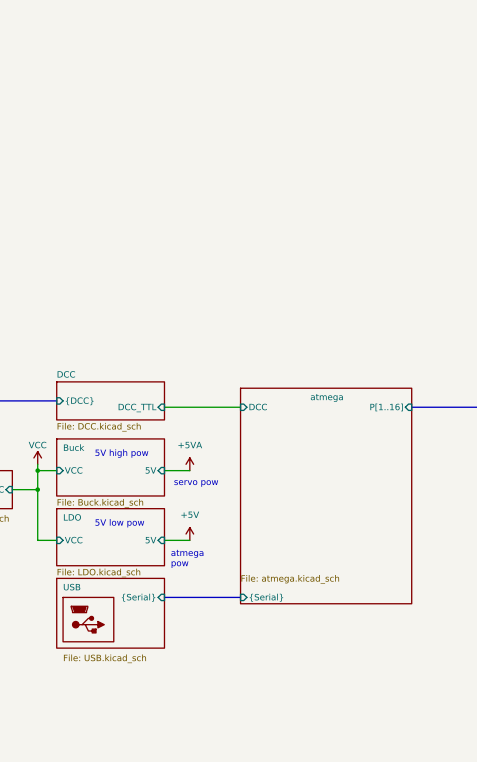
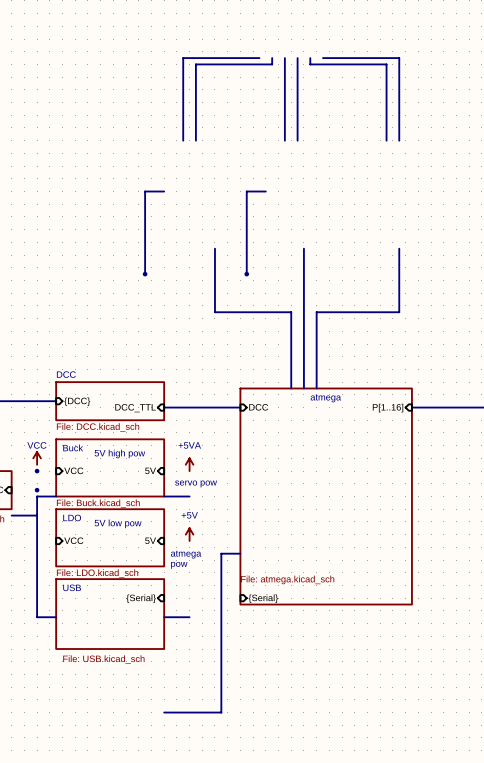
wire: none -> (259, 58) (183, 58) (183, 140)
wire: none -> (272, 58) (272, 64) (195, 64) (195, 140)
wire: none -> (284, 58) (284, 140)
wire: none -> (297, 58) (297, 140)
wire: none -> (310, 58) (310, 64) (386, 64) (386, 140)
wire: none -> (323, 58) (399, 58) (399, 140)
bus: none -> (164, 191) (145, 191) (145, 274)
bus: none -> (265, 191) (246, 191) (246, 274)
bus: none -> (214, 248) (214, 312) (291, 312) (291, 388)
bus: none -> (303, 248) (303, 388)
bus: none -> (399, 248) (399, 312) (316, 312) (316, 388)
junction: none -> (145, 274)
junction: none -> (246, 274)
wire: (37, 464) (37, 495) -> (56, 496) (37, 496)
wire: (37, 470) (56, 470) -> none
wire: (164, 470) (189, 470) -> (164, 496) (189, 496)
wire: (12, 489) (37, 489) -> (11, 515) (37, 515)
wire: (37, 540) (56, 540) -> (37, 540) (37, 617) (56, 617)
wire: (164, 540) (189, 540) -> (164, 617) (189, 617)
bus: none -> (240, 553) (221, 553) (221, 712) (164, 712)
bus: (164, 597) (240, 597) -> none
part: (88, 619) -> none

